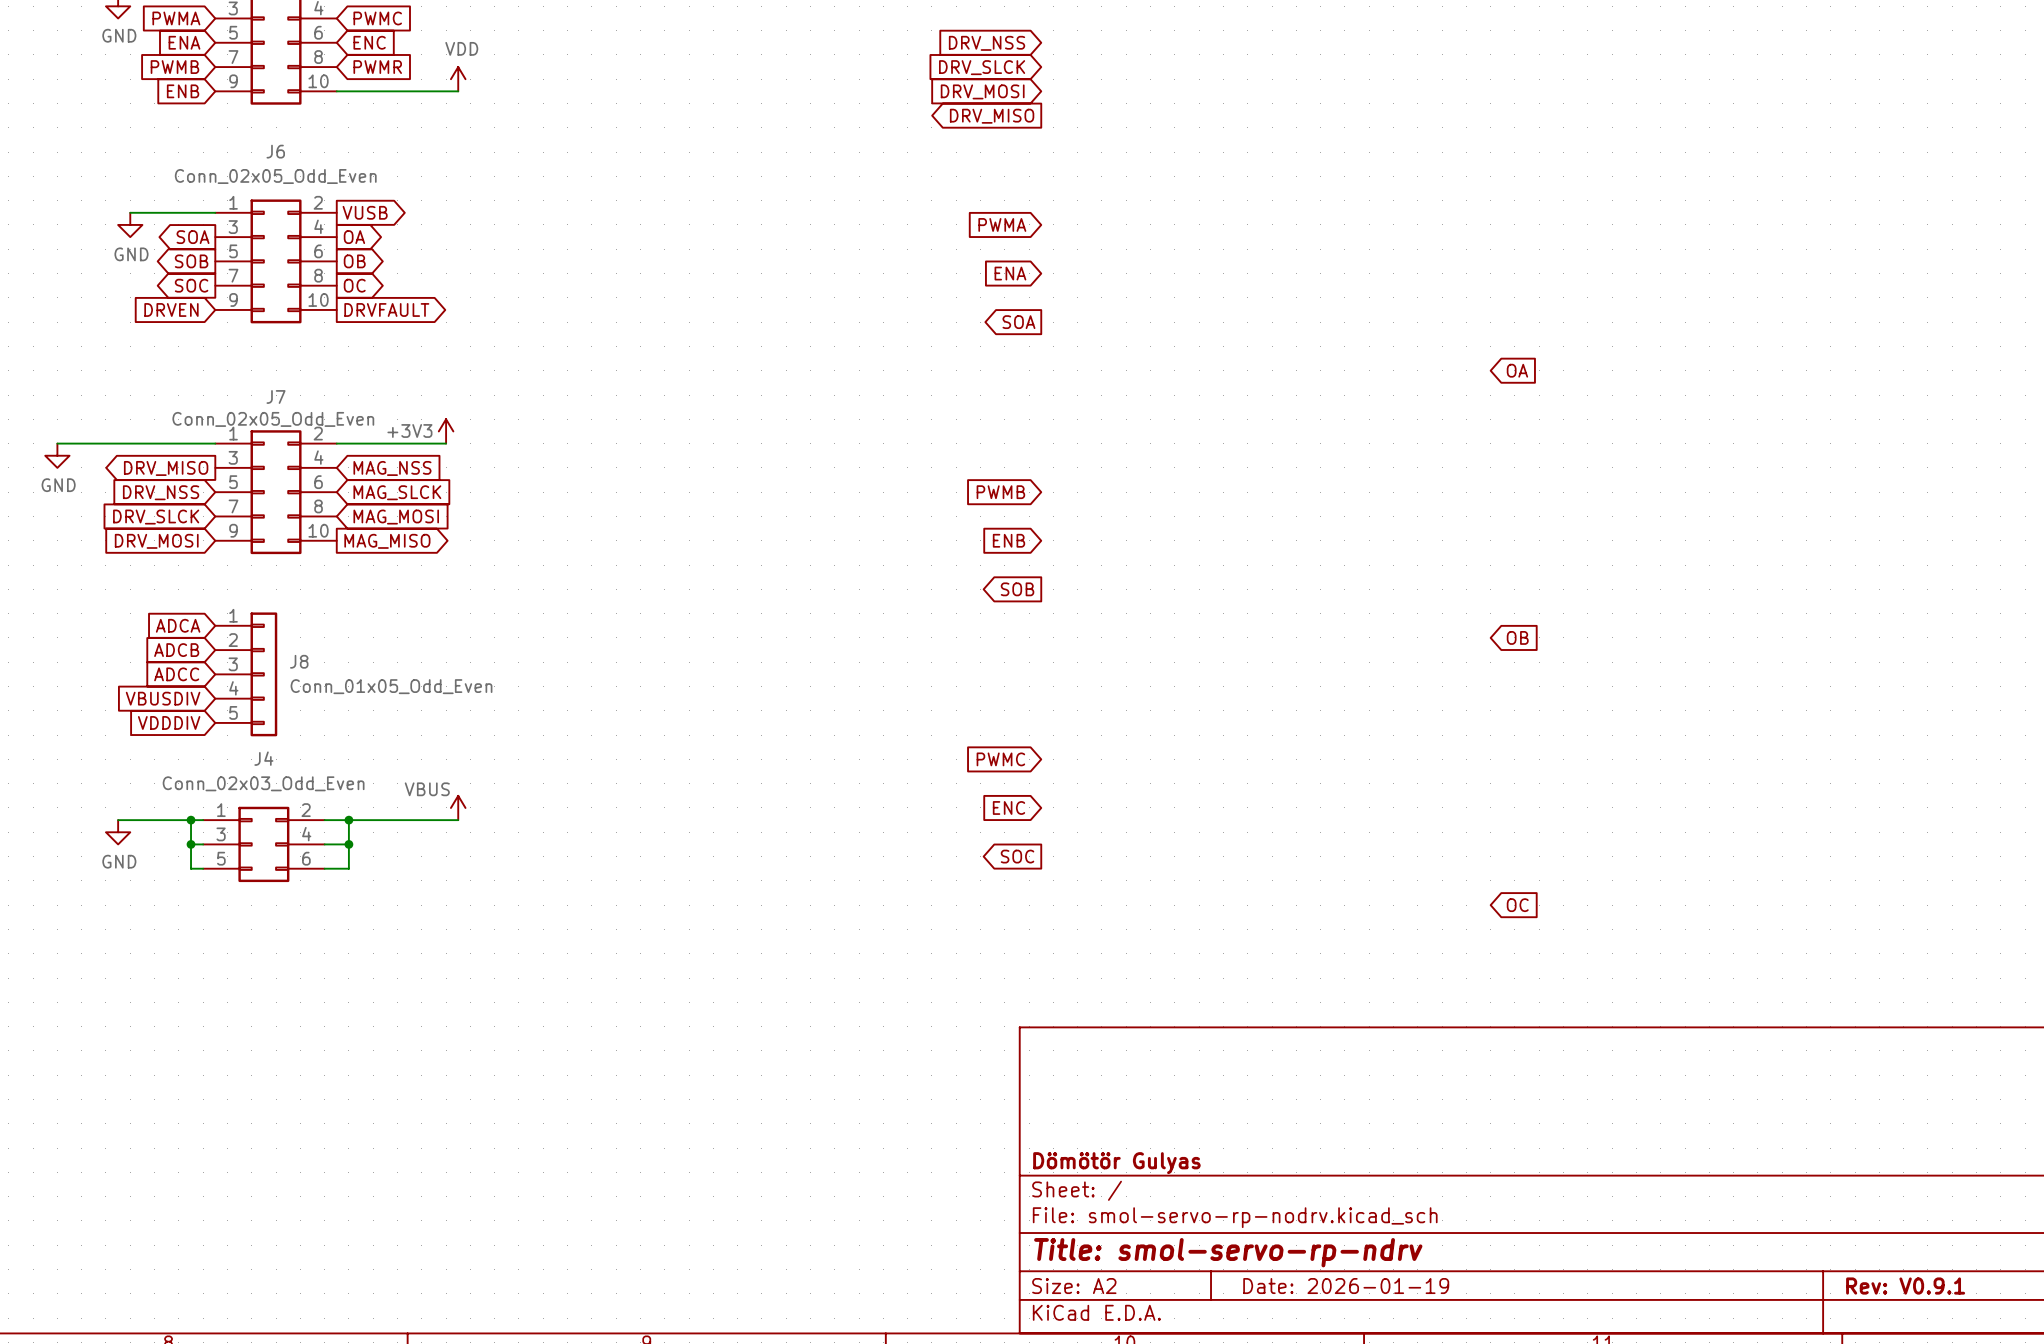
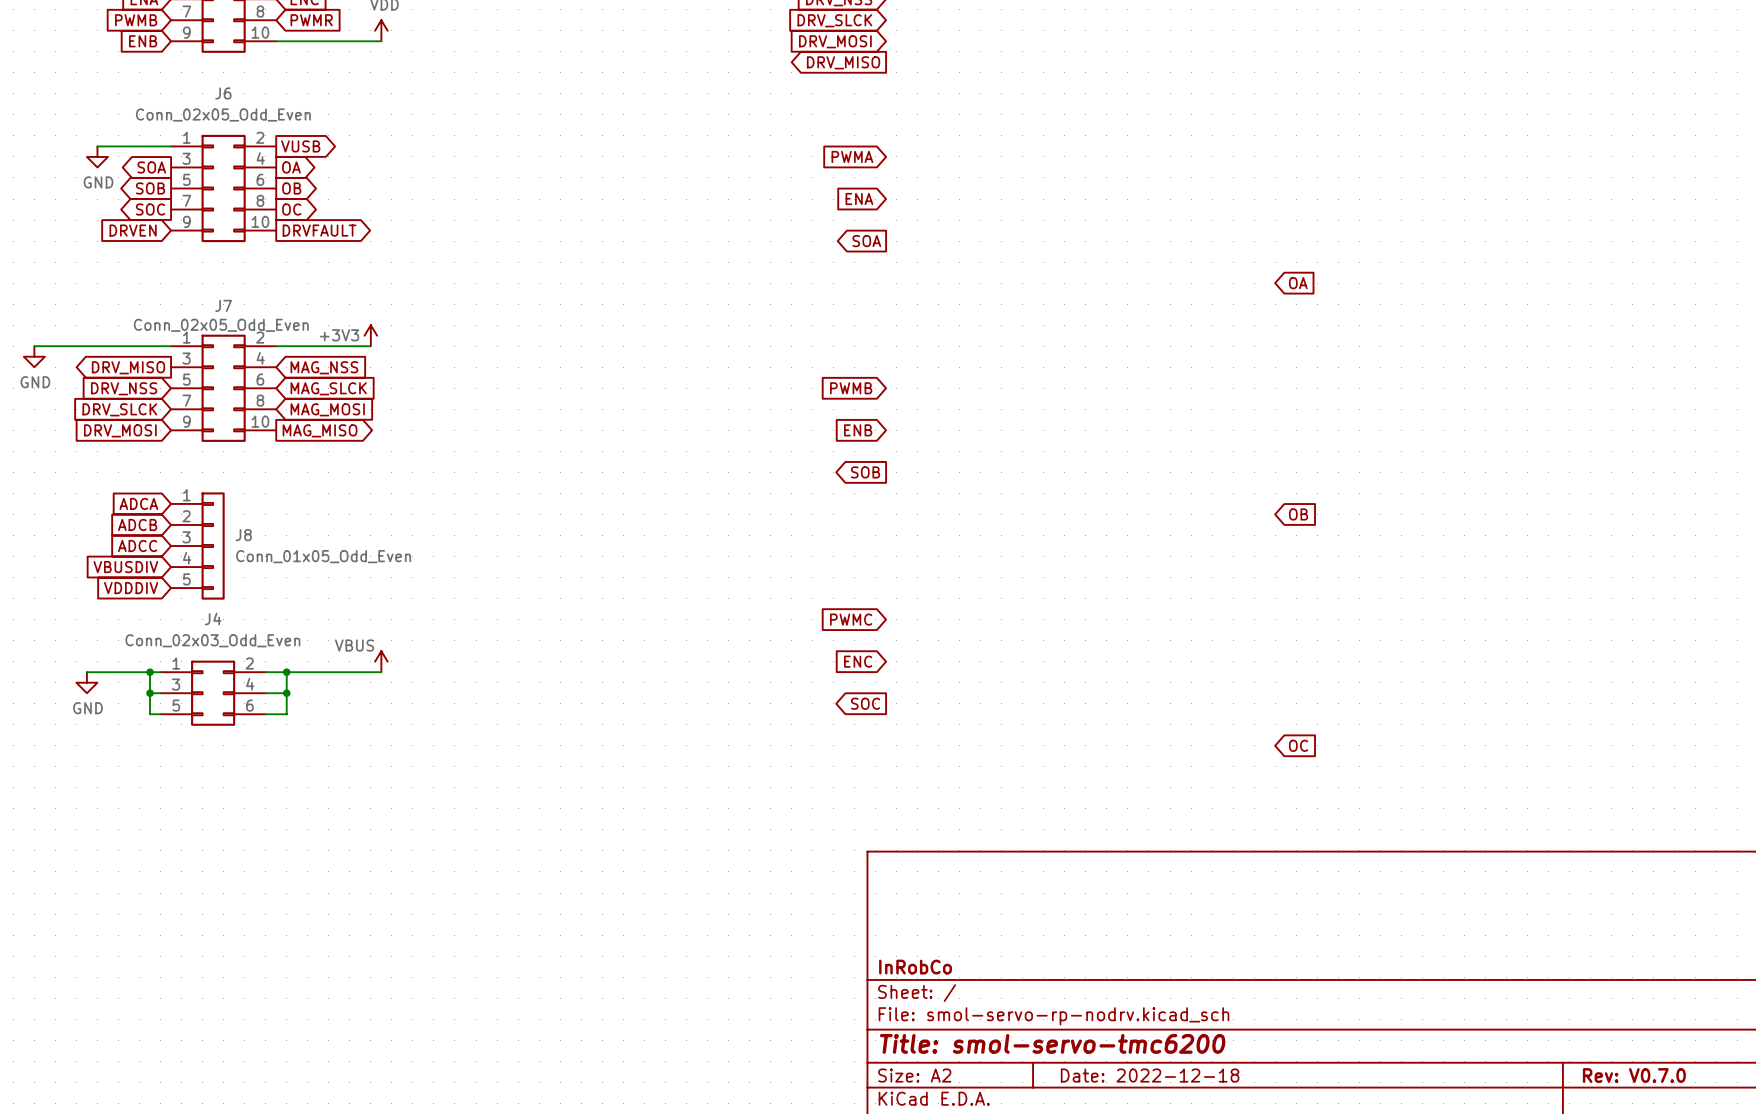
title block: Dömötör Gulyas (1116, 1163) -> InRobCo (915, 967)
title block: Title: smol-servo-rp-ndrv (1228, 1252) -> Title: smol-servo-tmc6200 (1052, 1043)
title block: Date: 2026-01-19 (1346, 1286) -> Date: 2022-12-18 (1150, 1075)
title block: Rev: V0.9.1 (1905, 1286) -> Rev: V0.7.0 (1634, 1075)

